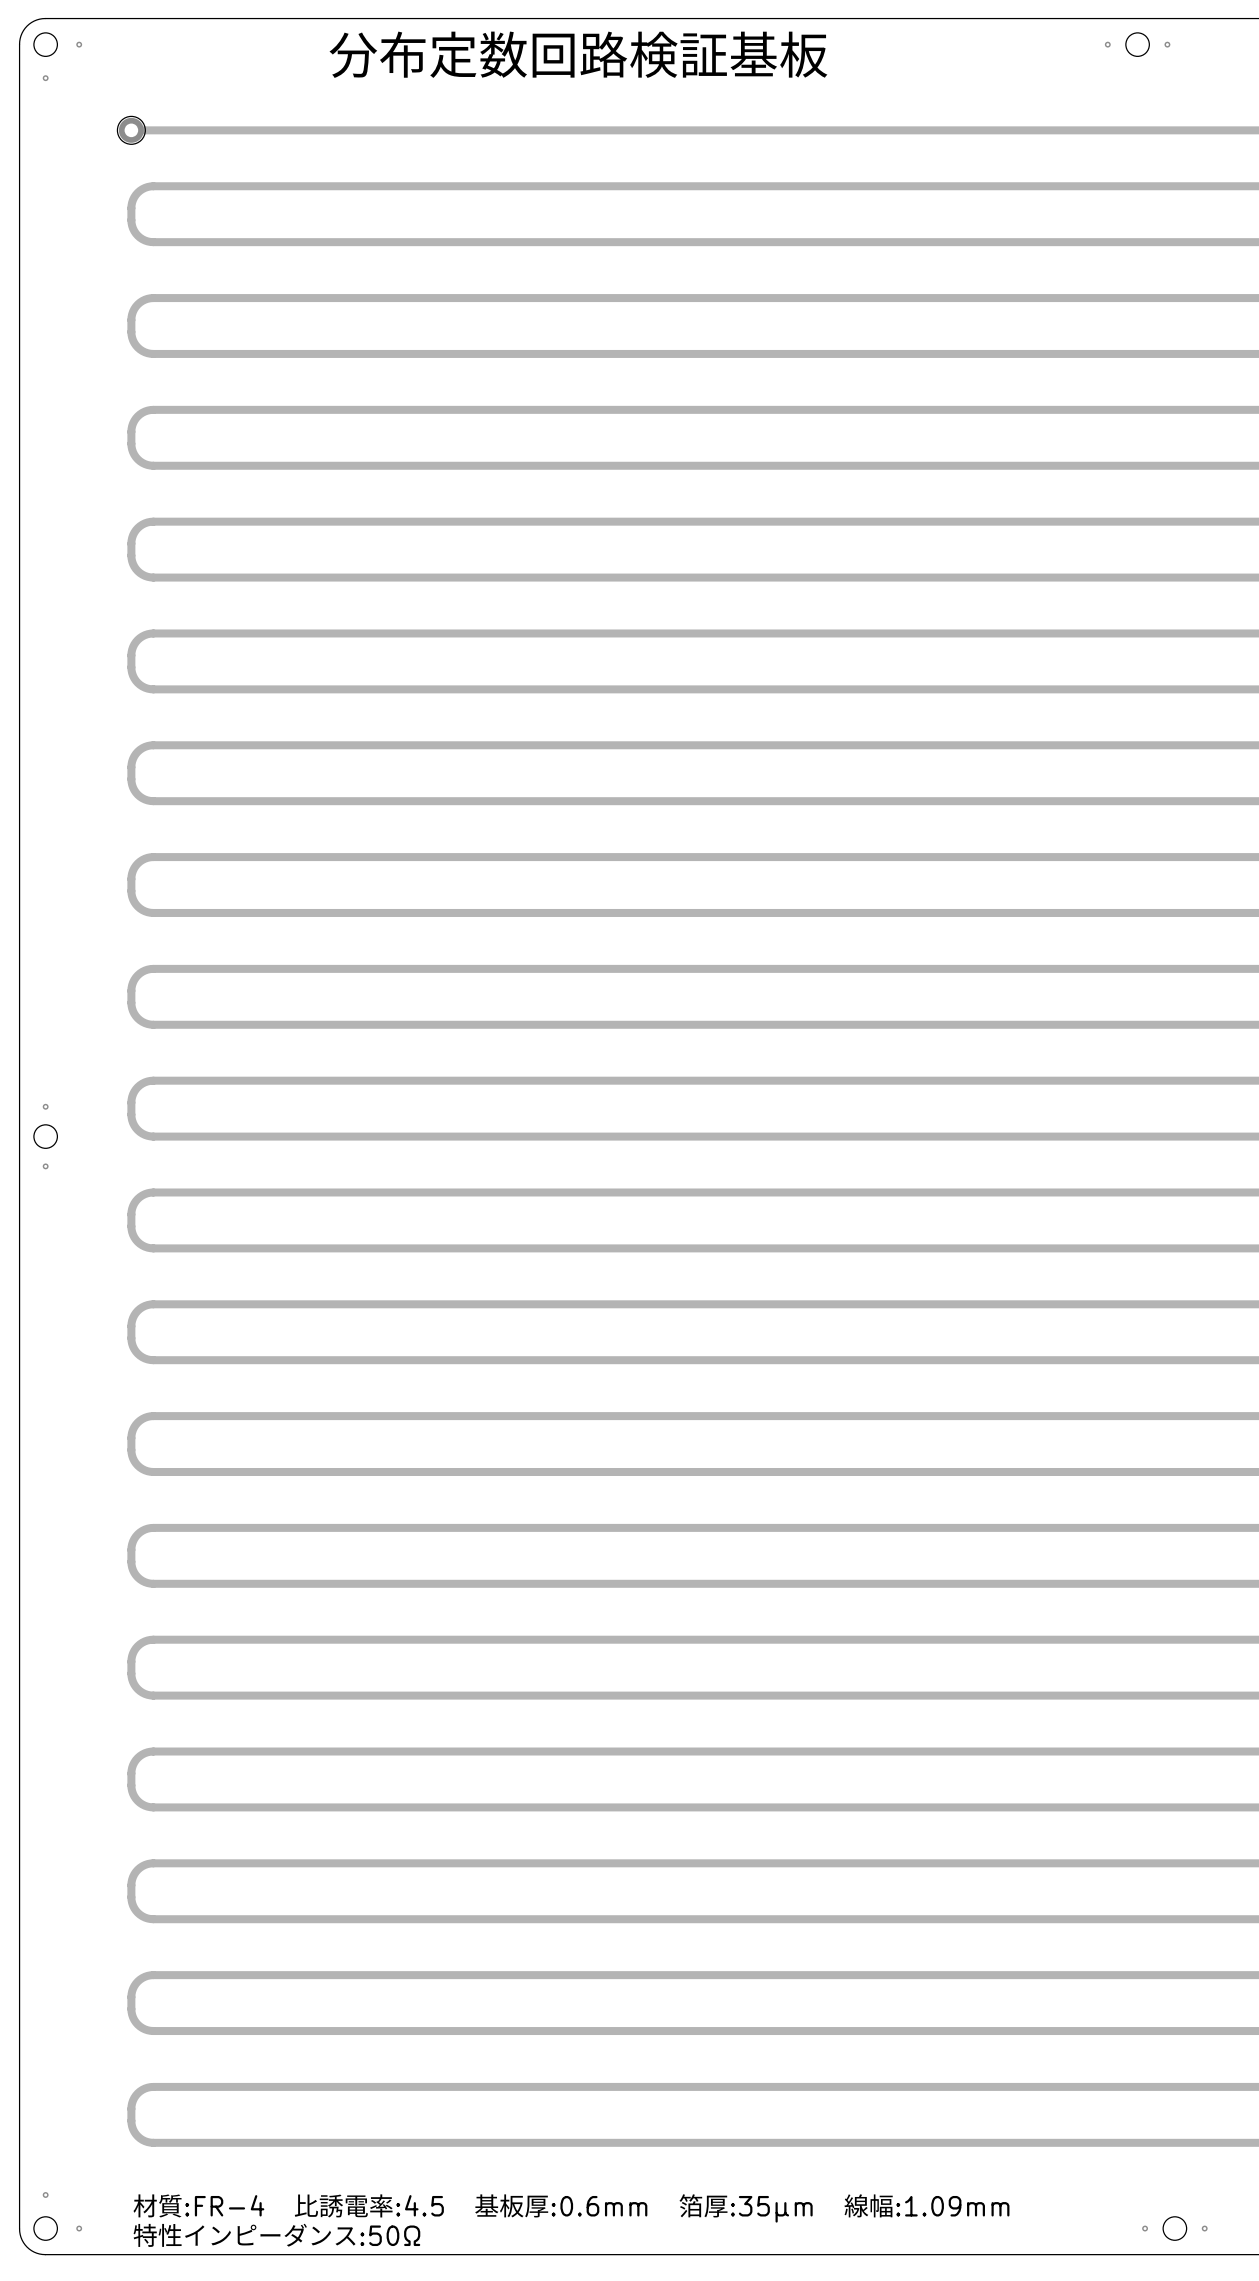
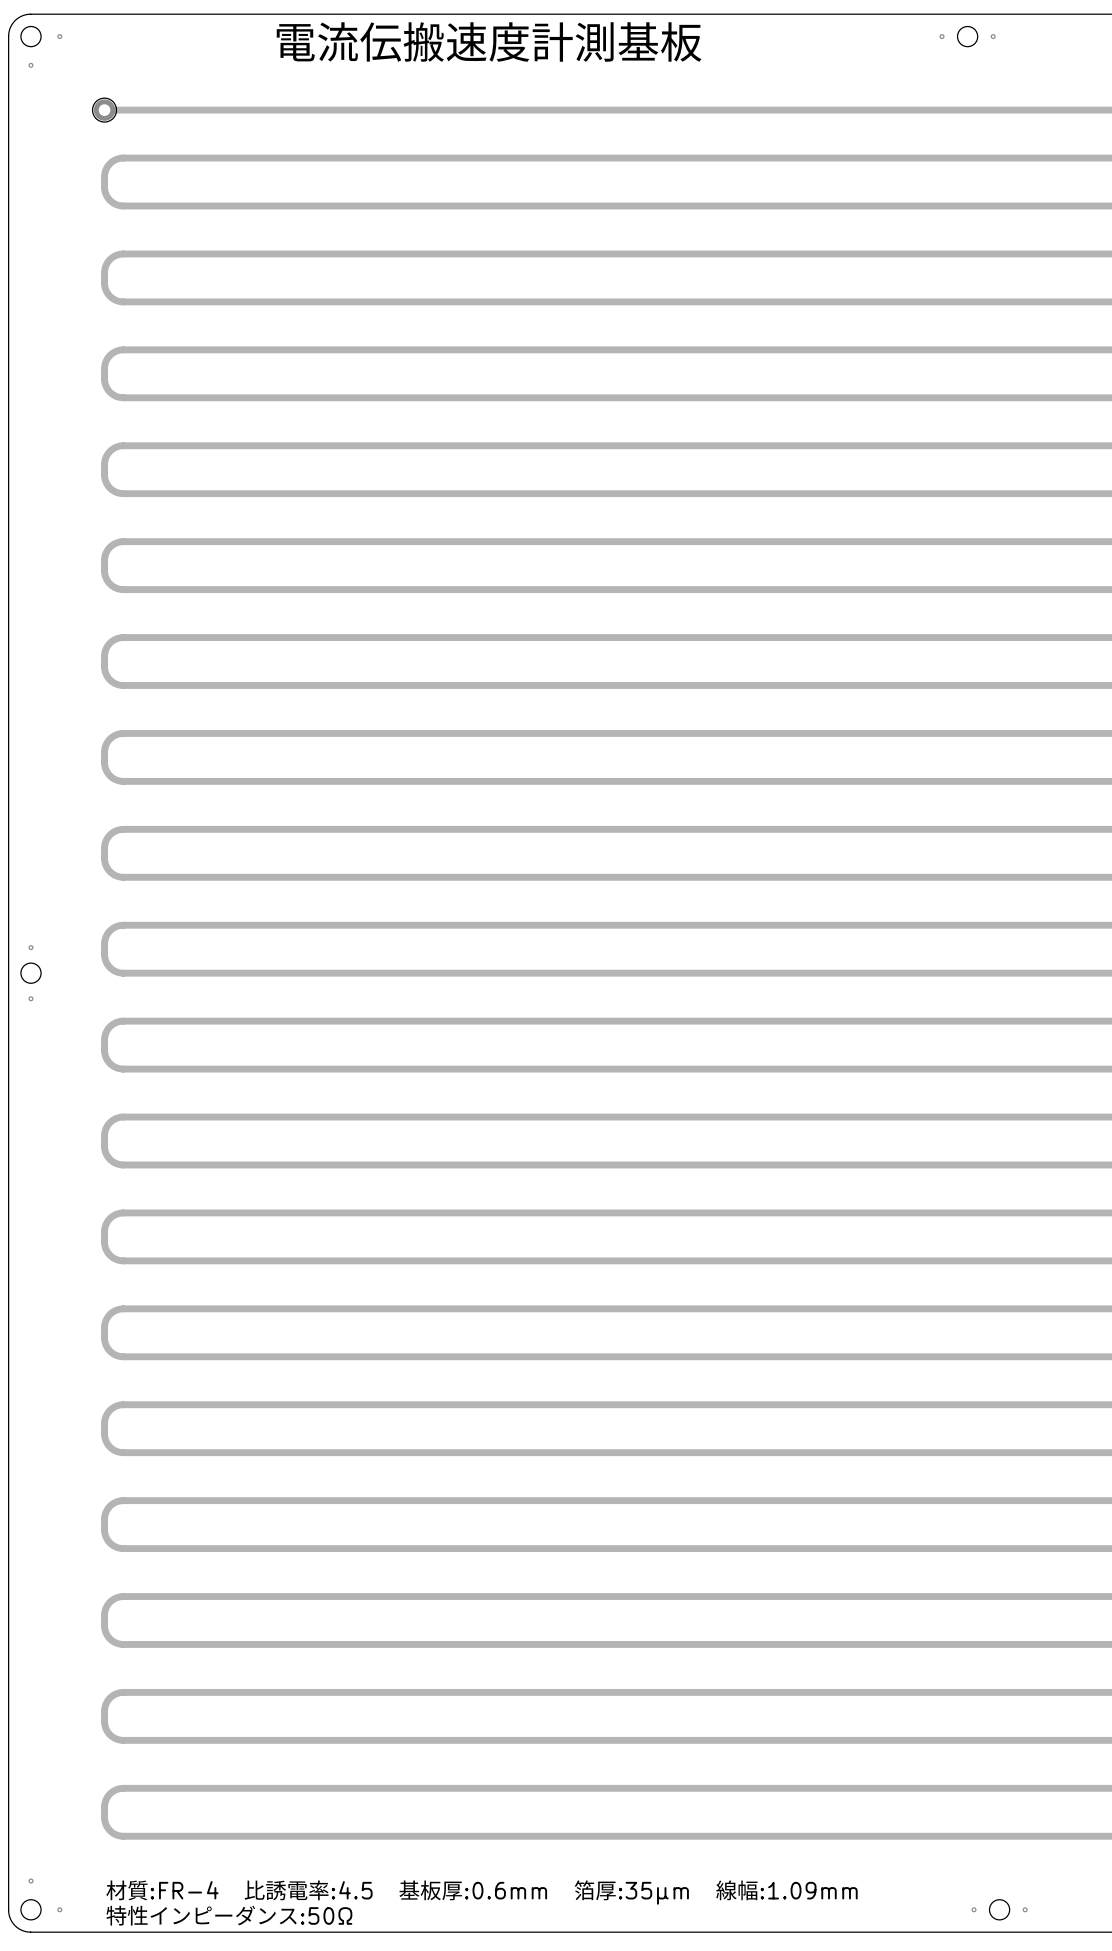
text: 分布定数回路検証基板 (578, 54) -> 電流伝搬速度計測基板 (489, 42)

